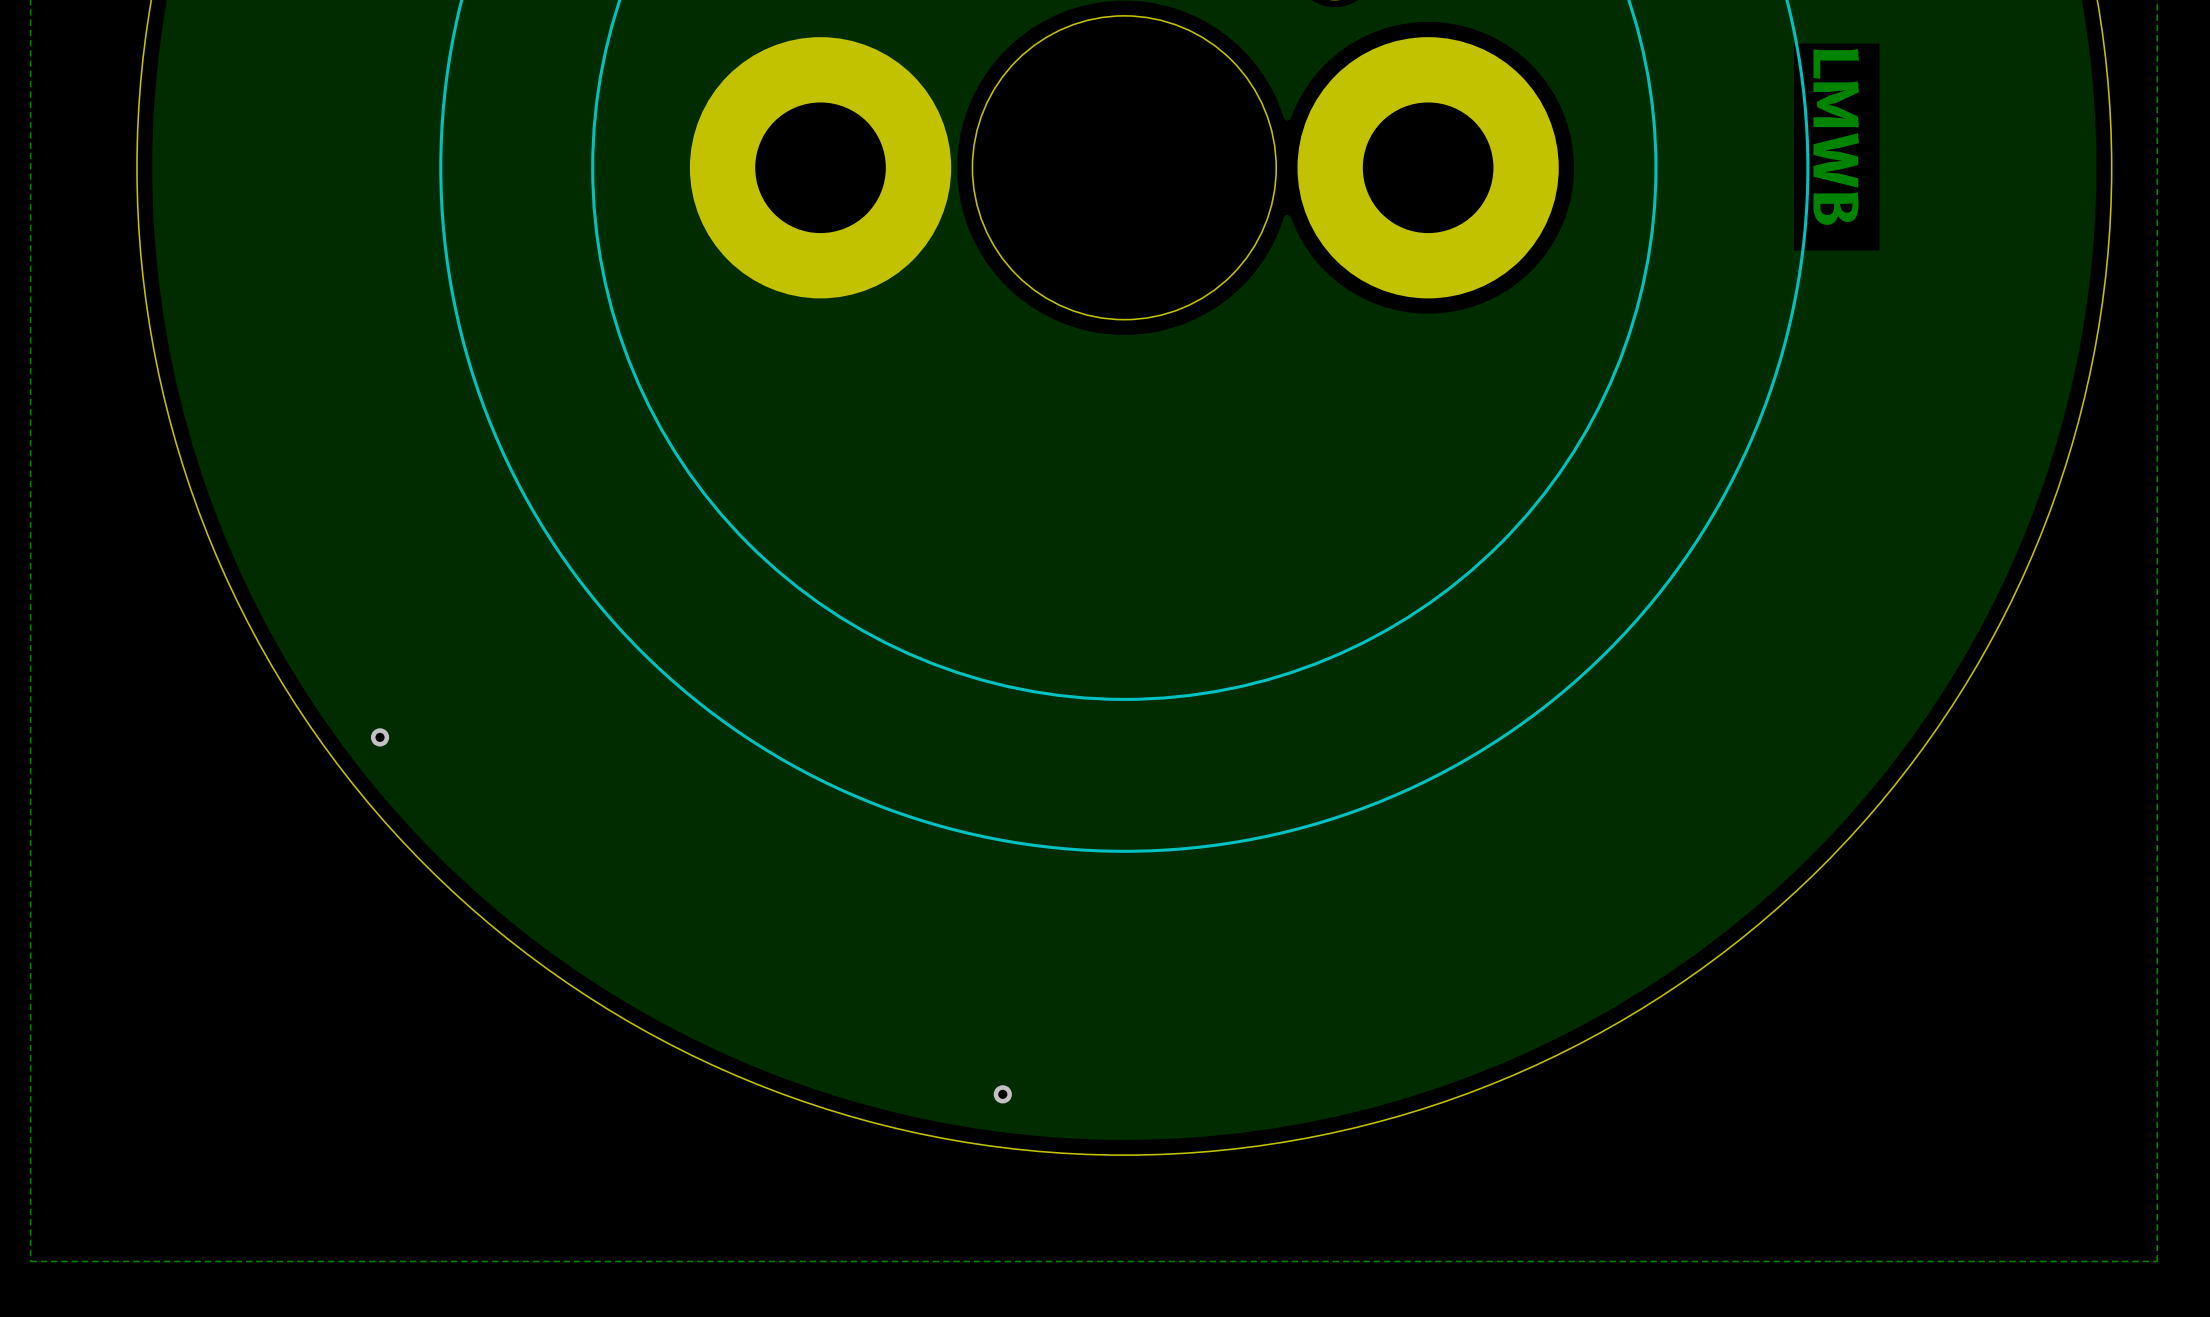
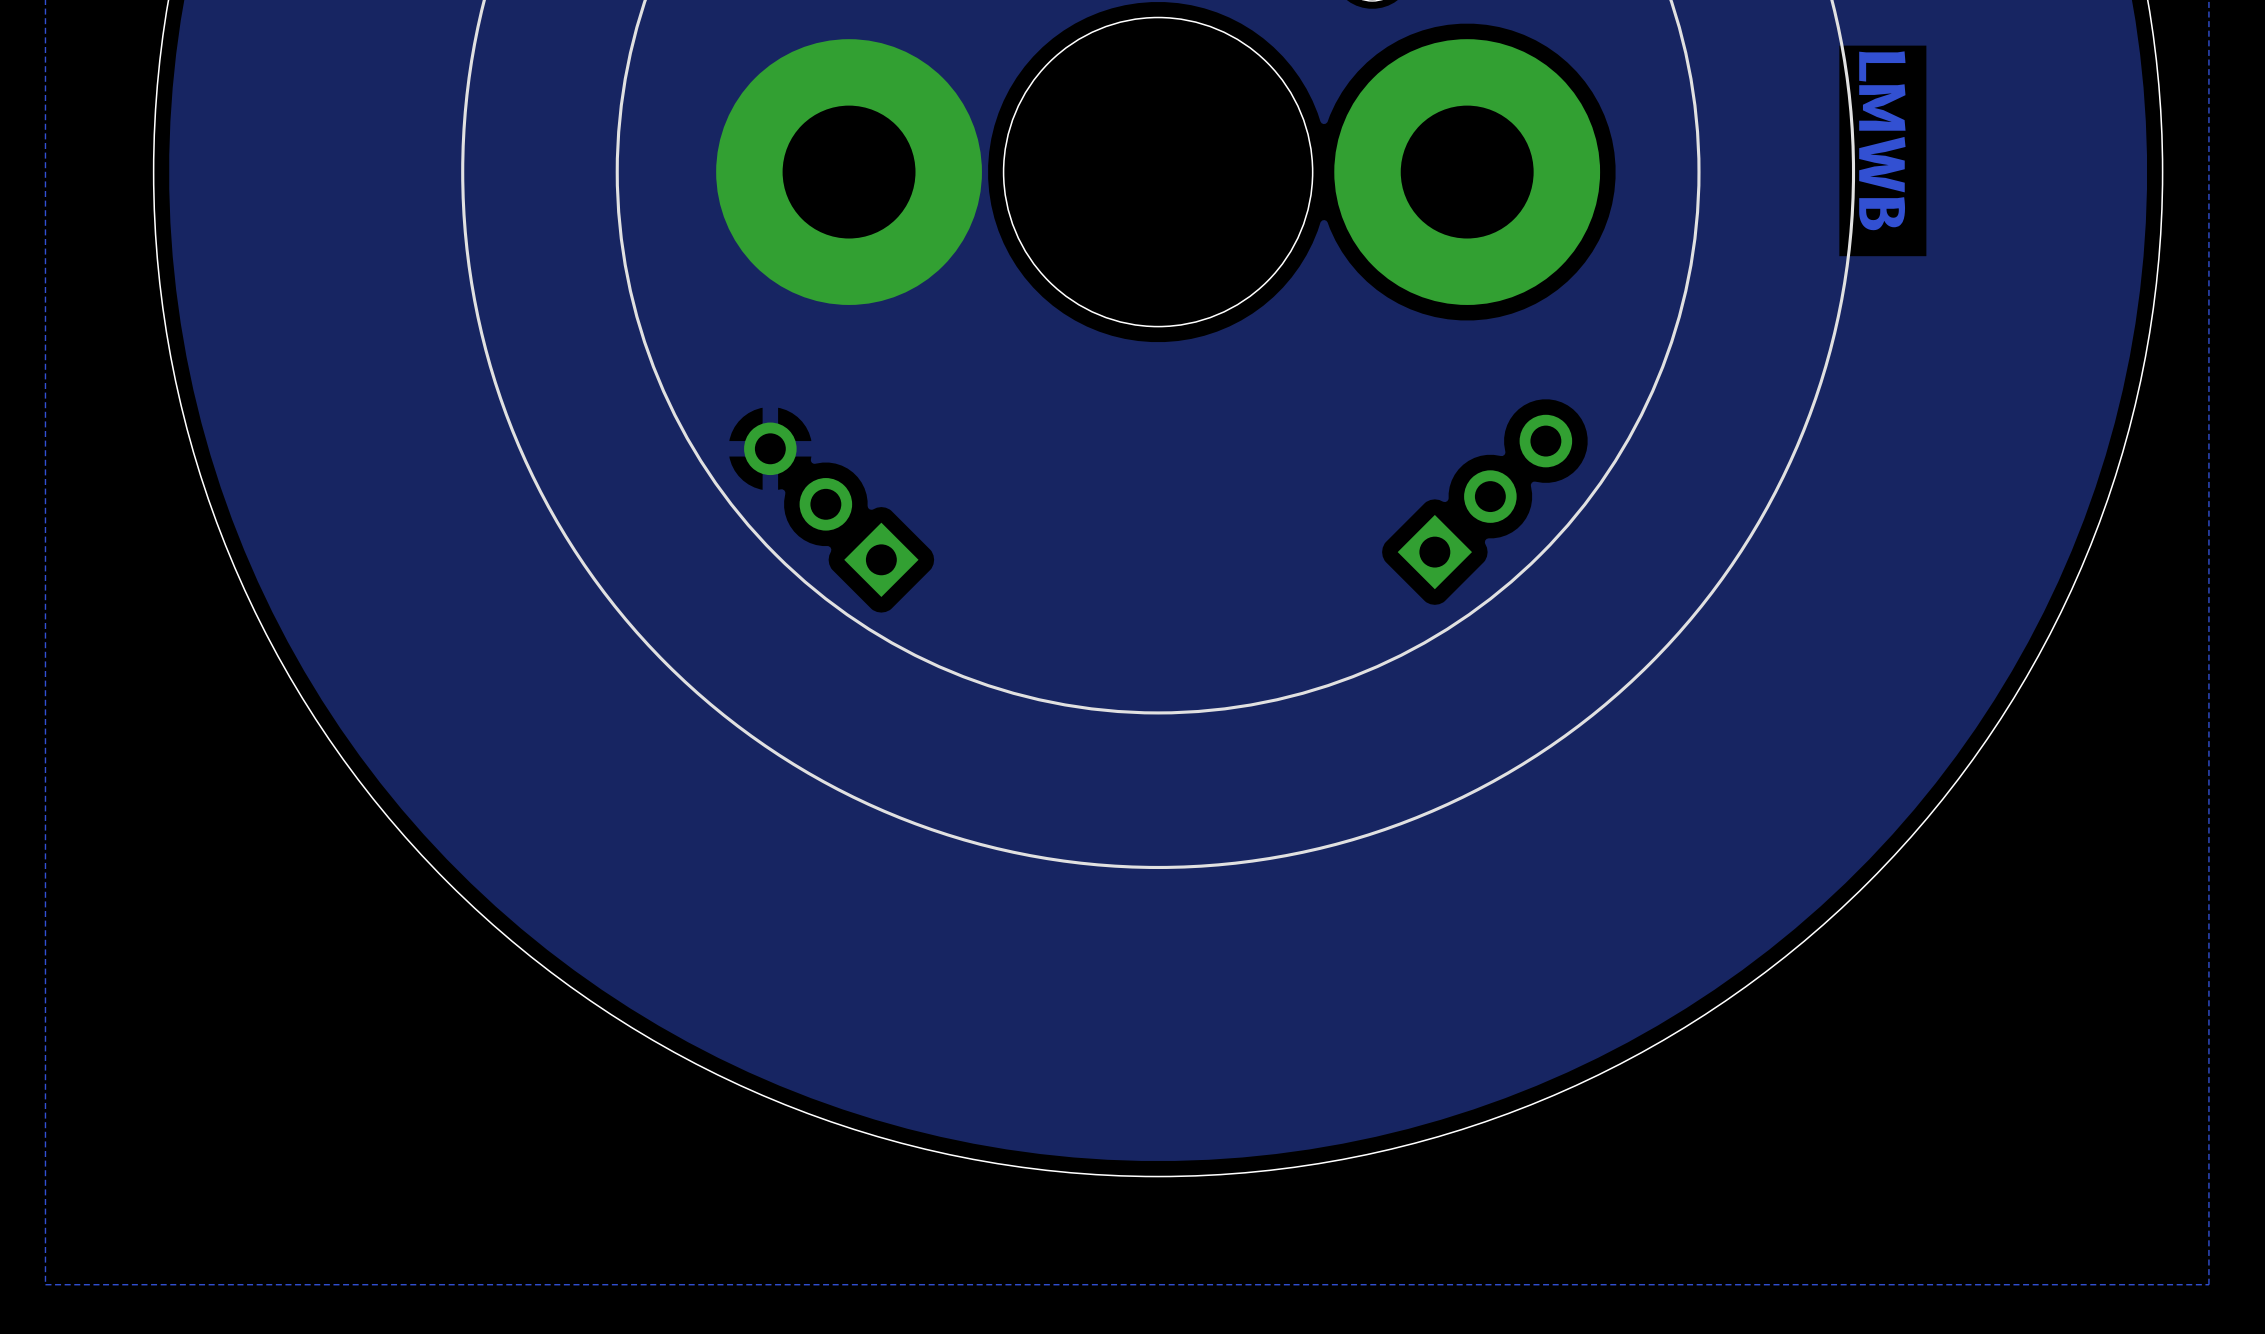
part: none -> (1484, 502)
part: none -> (831, 509)
via: (380, 737) -> none
via: (1002, 1094) -> none

